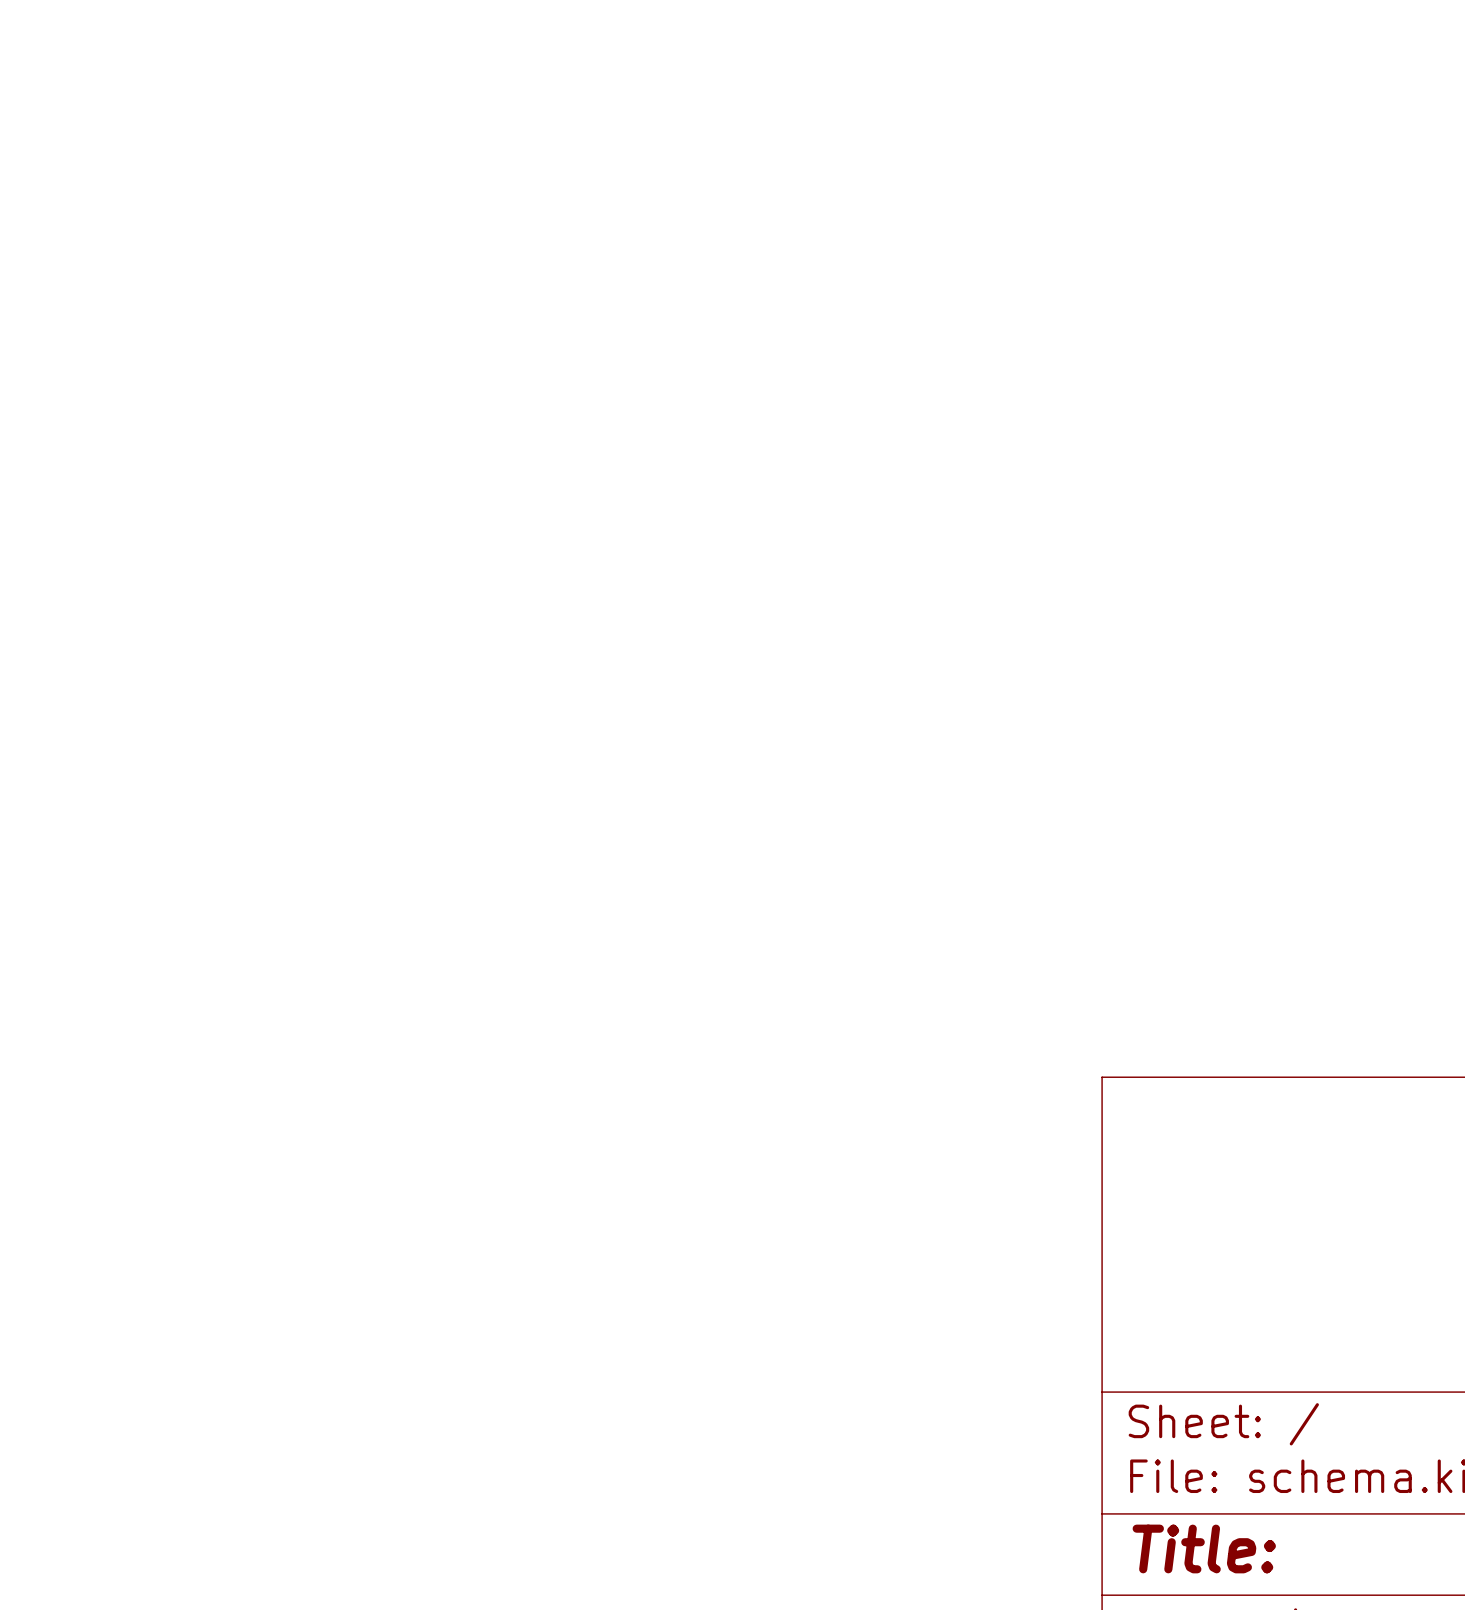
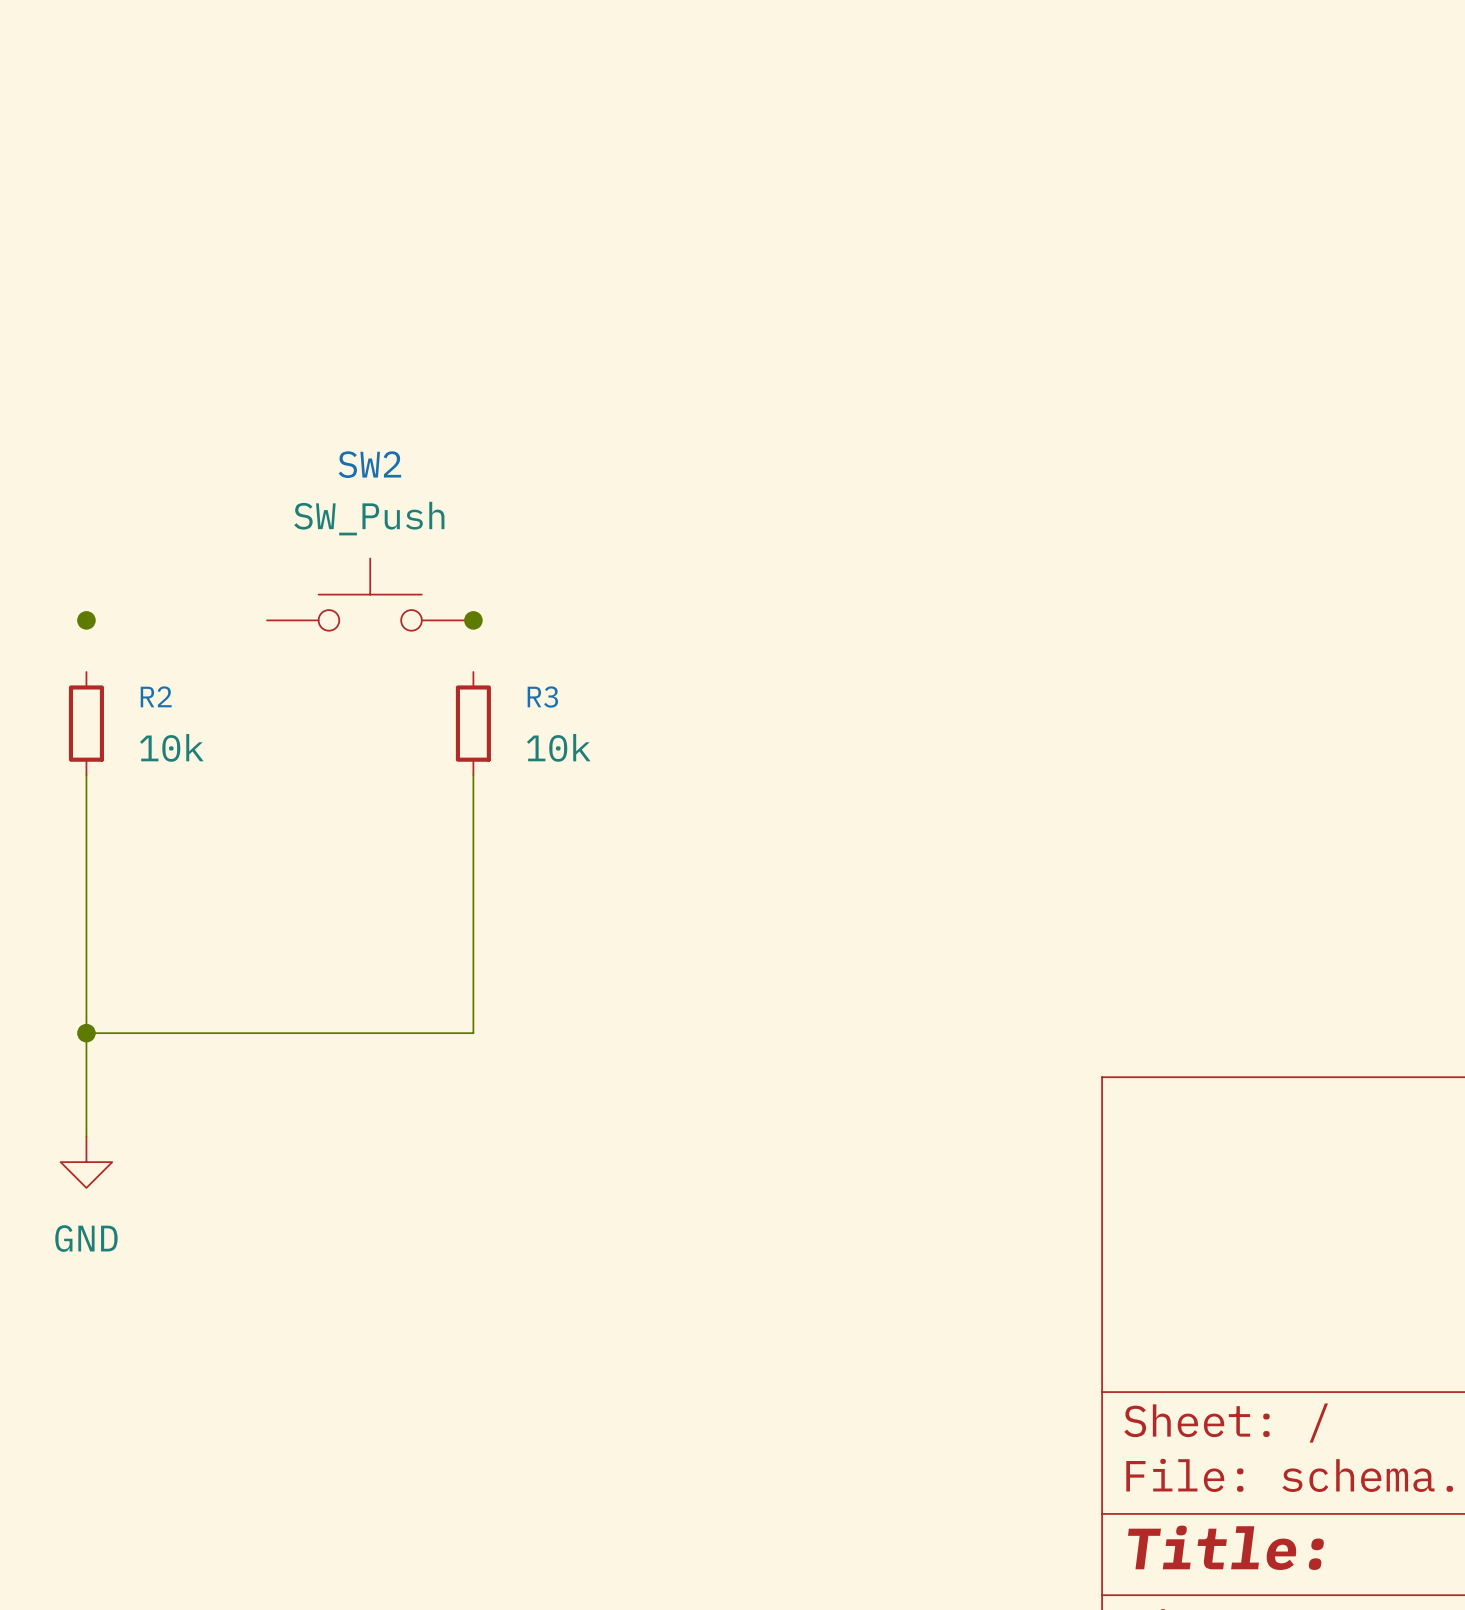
SW2: none -> SW_Push (370, 594)
junction: none -> (86, 620)
junction: none -> (473, 620)
R2: none -> 10k (86, 723)
R3: none -> 10k (473, 723)
wire: none -> (86, 775) (86, 1136)
wire: none -> (473, 775) (473, 1033) (86, 1033)
junction: none -> (86, 1033)
power symbol: none -> GND (86, 1162)

